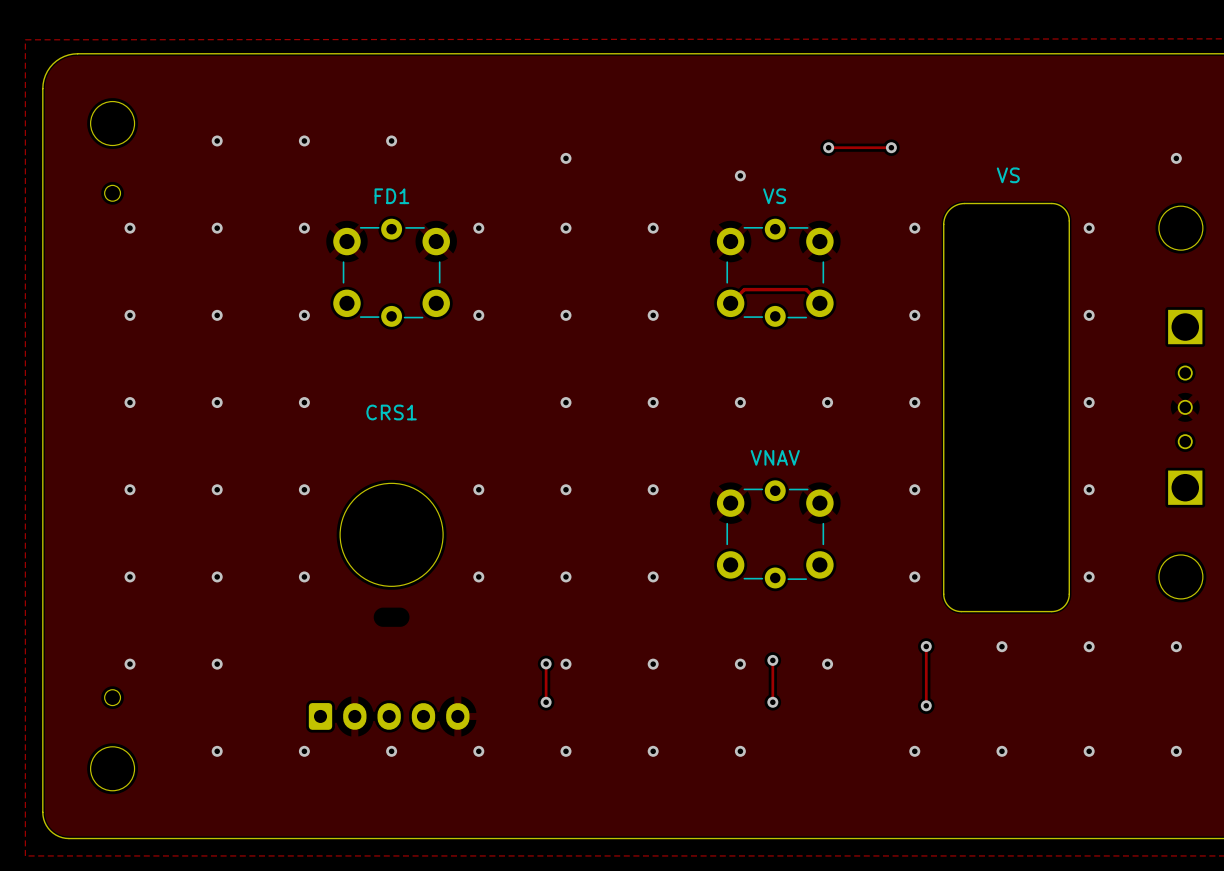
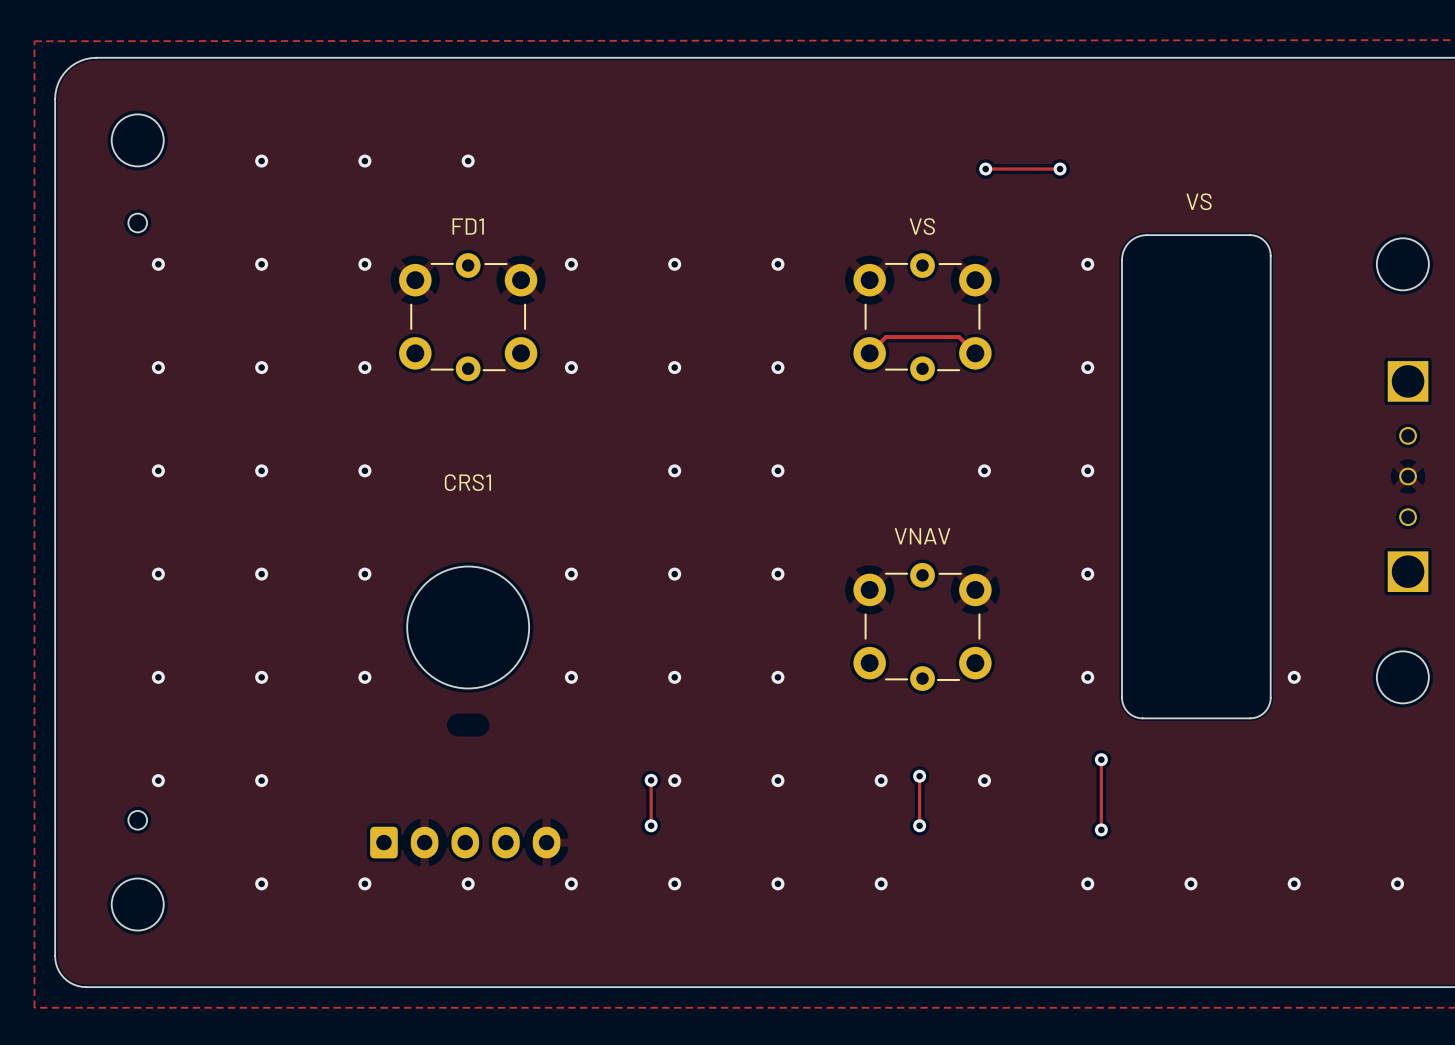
via: (565, 158) -> none
via: (1176, 158) -> none
via: (740, 175) -> none
via: (1089, 228) -> none
via: (1089, 315) -> none
via: (740, 402) -> none
via: (1089, 402) -> none
via: (1089, 489) -> none
via: (1001, 646) -> none
via: (1089, 646) -> none
via: (1176, 646) -> none

